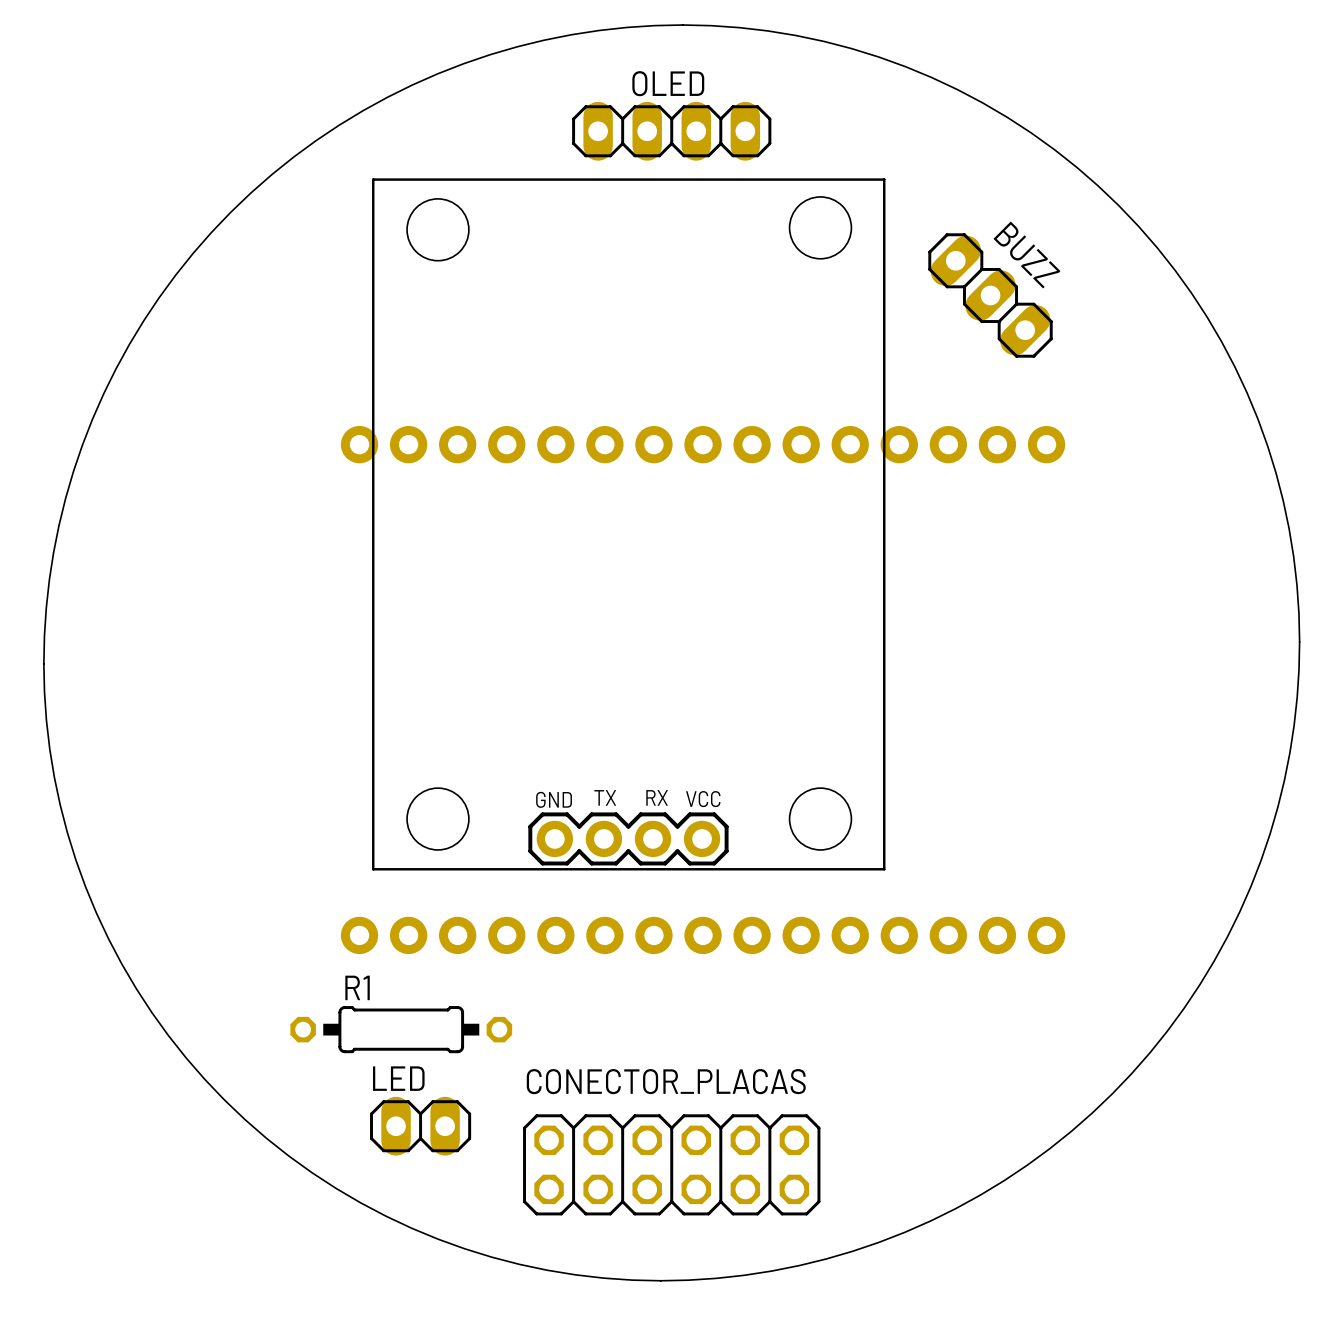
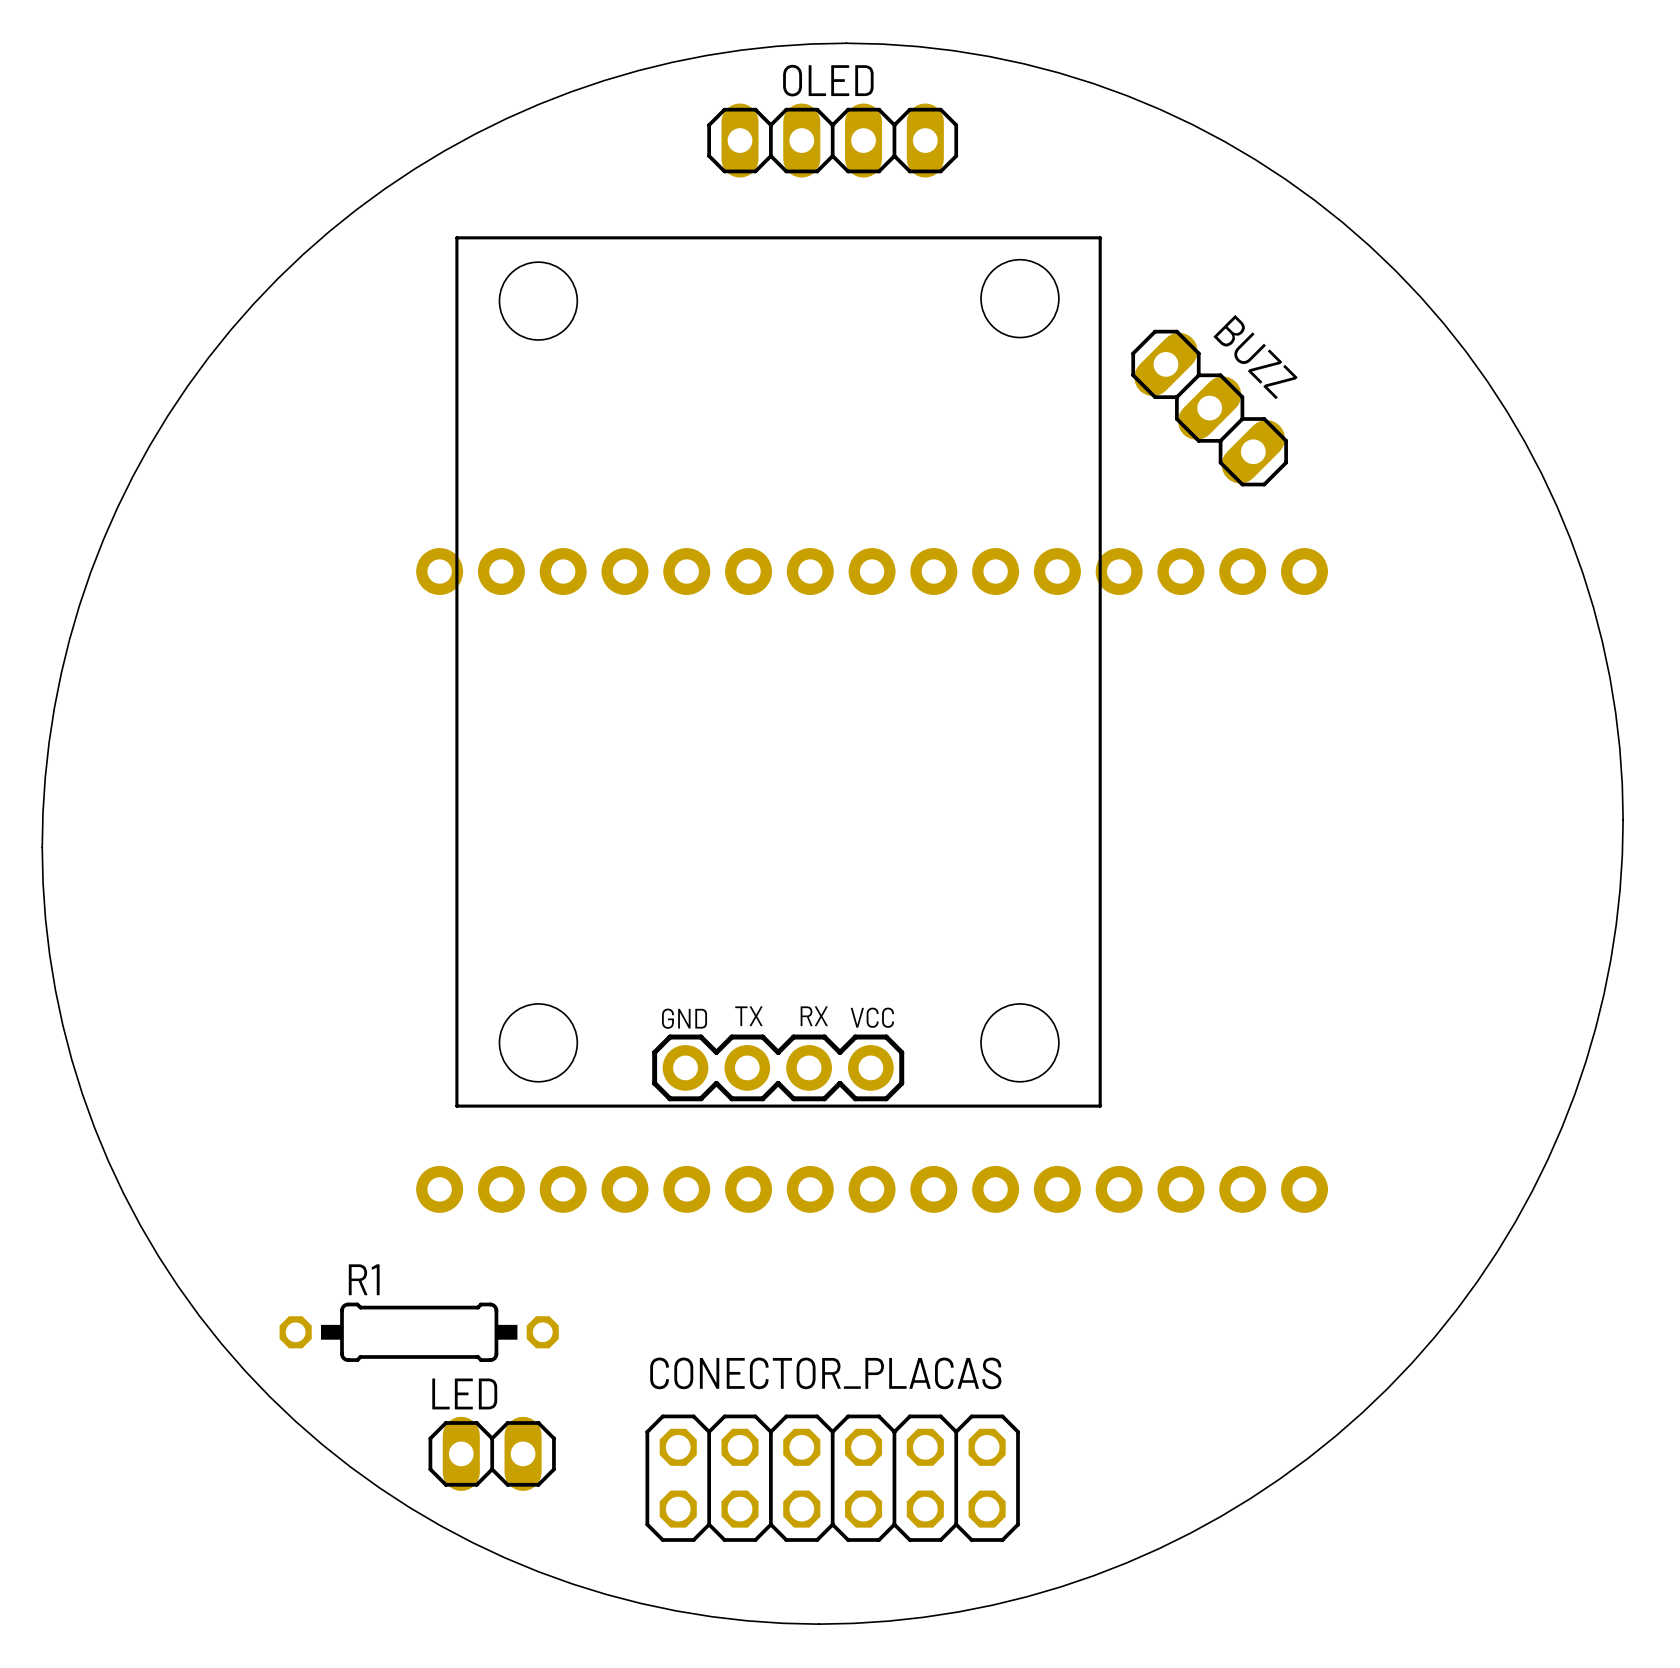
OLED position: (671, 131) -> (832, 140)
BUZZ position: (990, 295) -> (1209, 408)
R1 position: (401, 1029) -> (419, 1332)
LED position: (420, 1126) -> (492, 1453)

